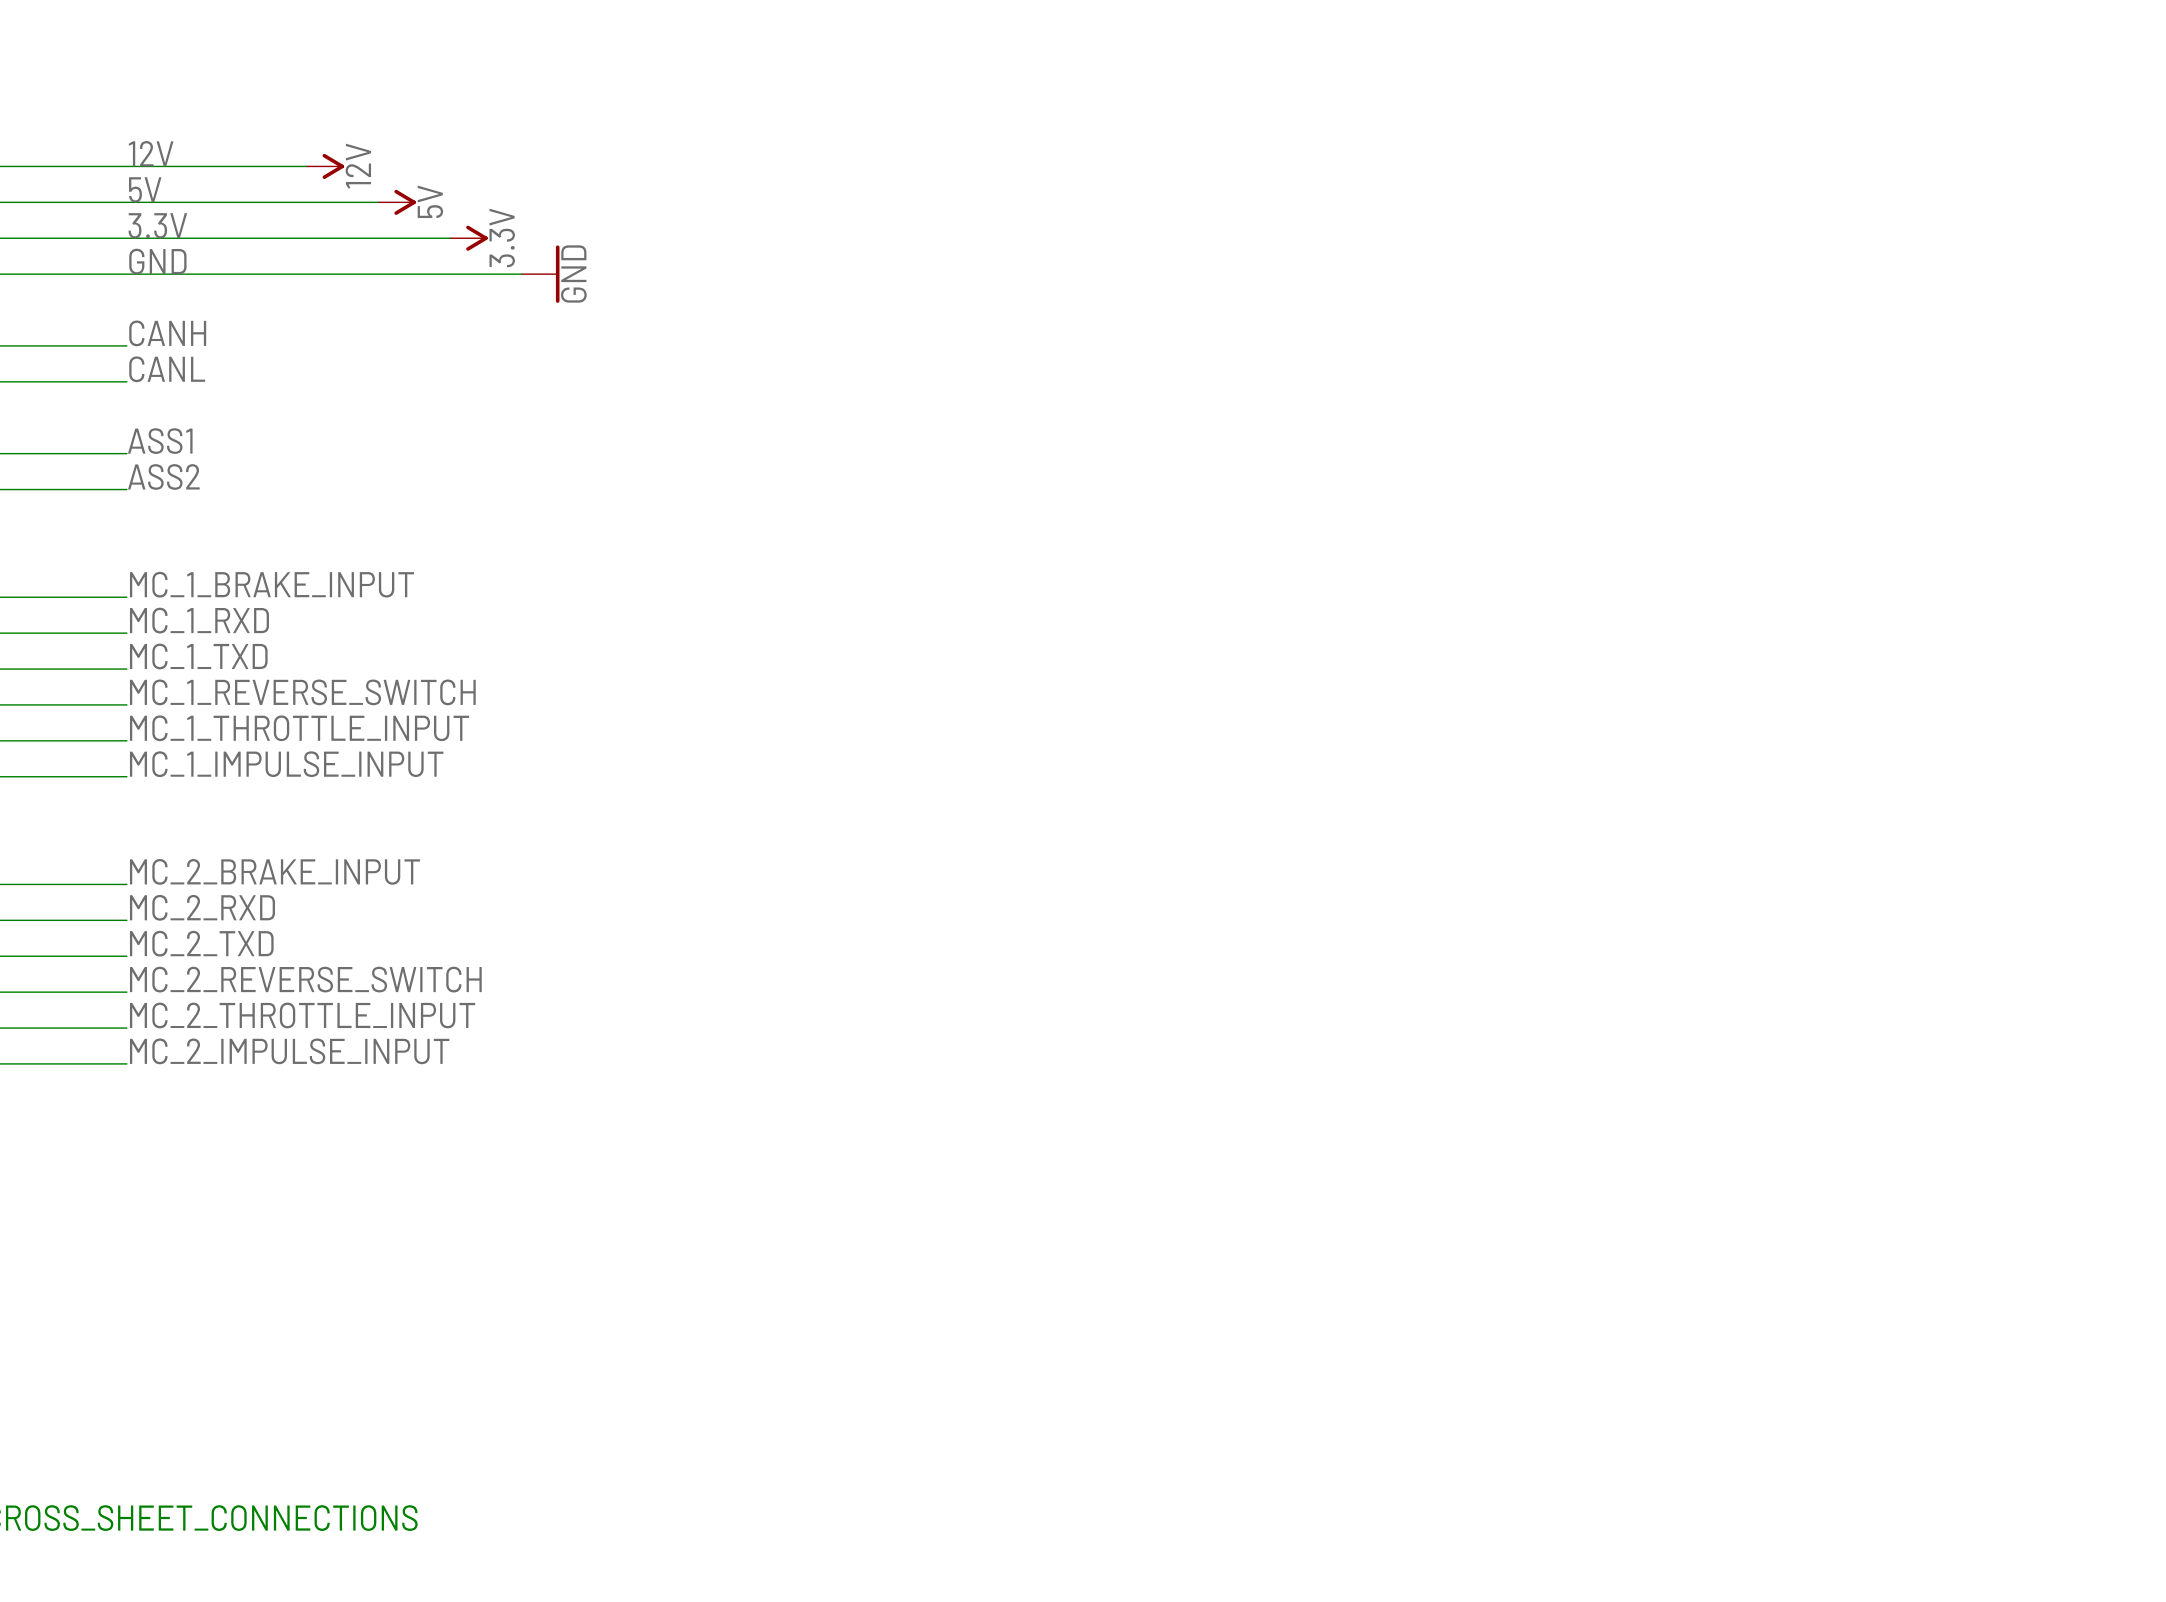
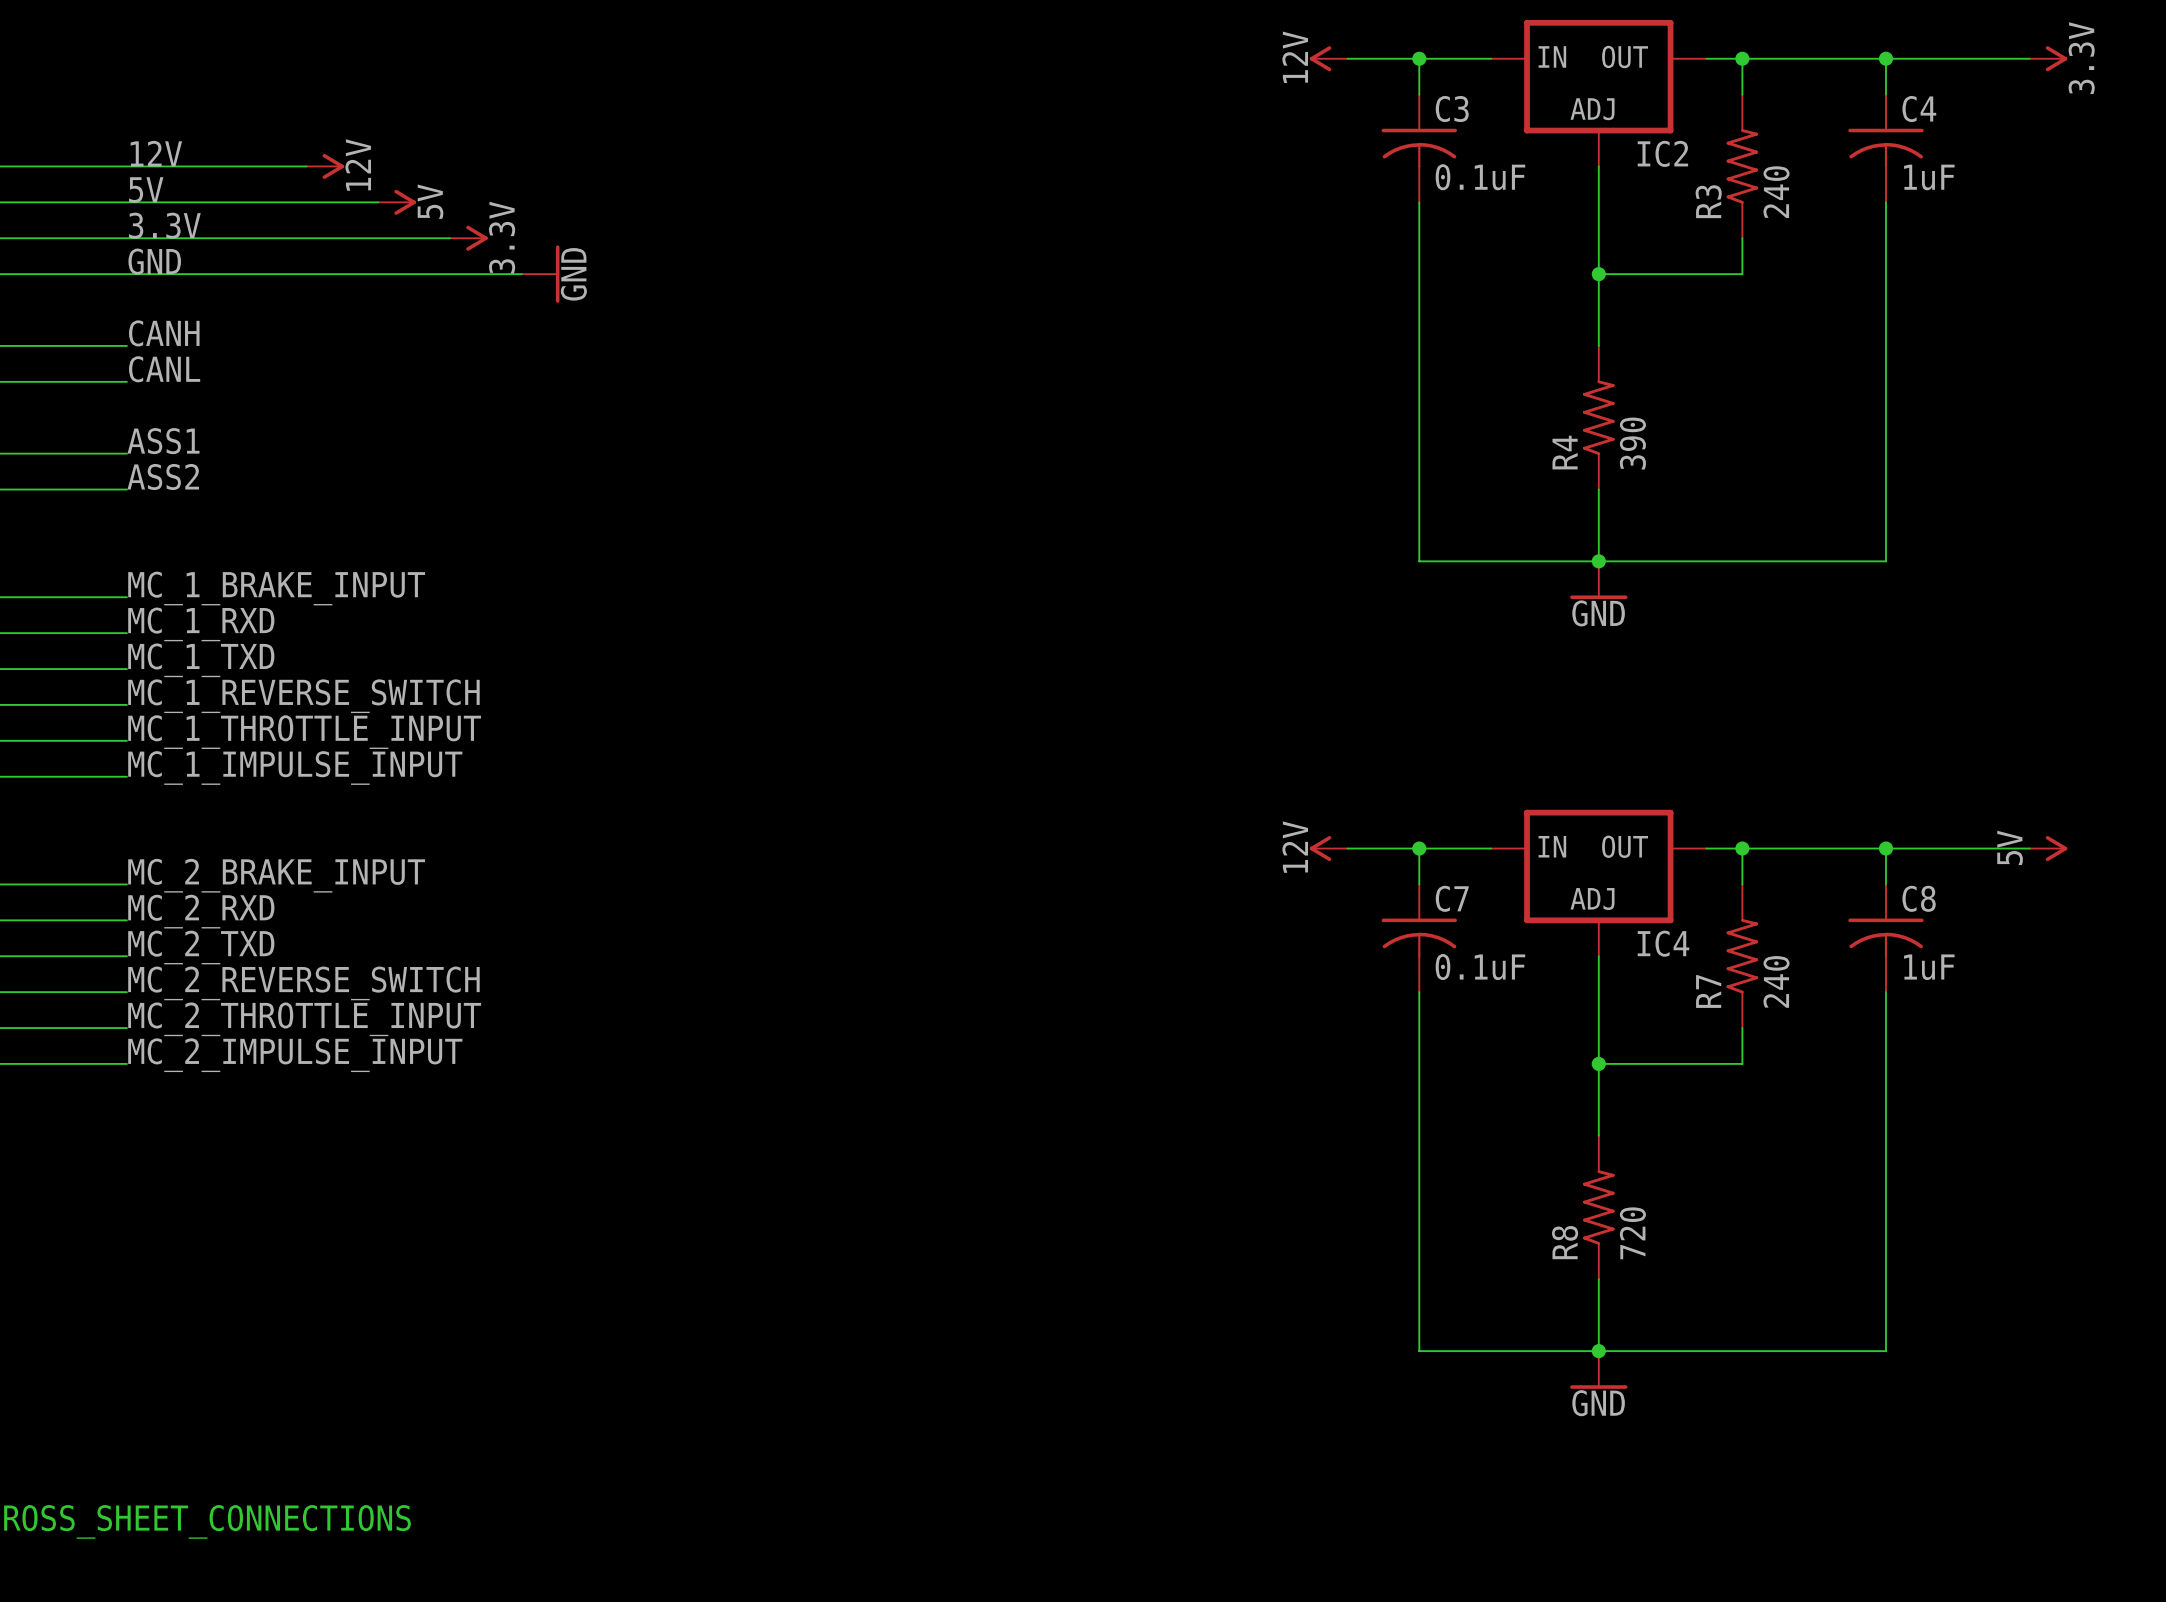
power symbol: none -> 12V (1328, 58)
wire: none -> (1347, 58) (1491, 58)
wire: none -> (1419, 58) (1419, 94)
junction: none -> (1419, 58)
wire: none -> (1706, 58) (2029, 58)
wire: none -> (1742, 58) (1742, 94)
junction: none -> (1742, 58)
wire: none -> (1885, 58) (1885, 94)
junction: none -> (1885, 58)
power symbol: none -> 3.3V (2048, 58)
IC2: none -> (1598, 93)
C3: none -> 0.1uF (1419, 148)
C4: none -> 1uF (1885, 148)
wire: none -> (1598, 166) (1598, 345)
R3: none -> 240 (1742, 166)
wire: none -> (1419, 202) (1419, 561) (1885, 561) (1885, 202)
wire: none -> (1742, 238) (1742, 274) (1598, 274)
junction: none -> (1598, 274)
R4: none -> 390 (1598, 417)
wire: none -> (1598, 489) (1598, 561)
junction: none -> (1598, 561)
power symbol: none -> GND (1598, 580)
power symbol: none -> 12V (1328, 848)
wire: none -> (1347, 848) (1491, 848)
wire: none -> (1419, 848) (1419, 884)
junction: none -> (1419, 848)
wire: none -> (1706, 848) (2029, 848)
wire: none -> (1742, 848) (1742, 884)
junction: none -> (1742, 848)
wire: none -> (1885, 848) (1885, 884)
junction: none -> (1885, 848)
power symbol: none -> 5V (2048, 848)
IC4: none -> (1598, 883)
C7: none -> 0.1uF (1419, 938)
C8: none -> 1uF (1885, 938)
wire: none -> (1598, 956) (1598, 1135)
R7: none -> 240 (1742, 956)
wire: none -> (1419, 992) (1419, 1351) (1885, 1351) (1885, 992)
wire: none -> (1742, 1028) (1742, 1063) (1598, 1063)
junction: none -> (1598, 1063)
R8: none -> 720 (1598, 1207)
wire: none -> (1598, 1279) (1598, 1351)
junction: none -> (1598, 1351)
power symbol: none -> GND (1598, 1369)

